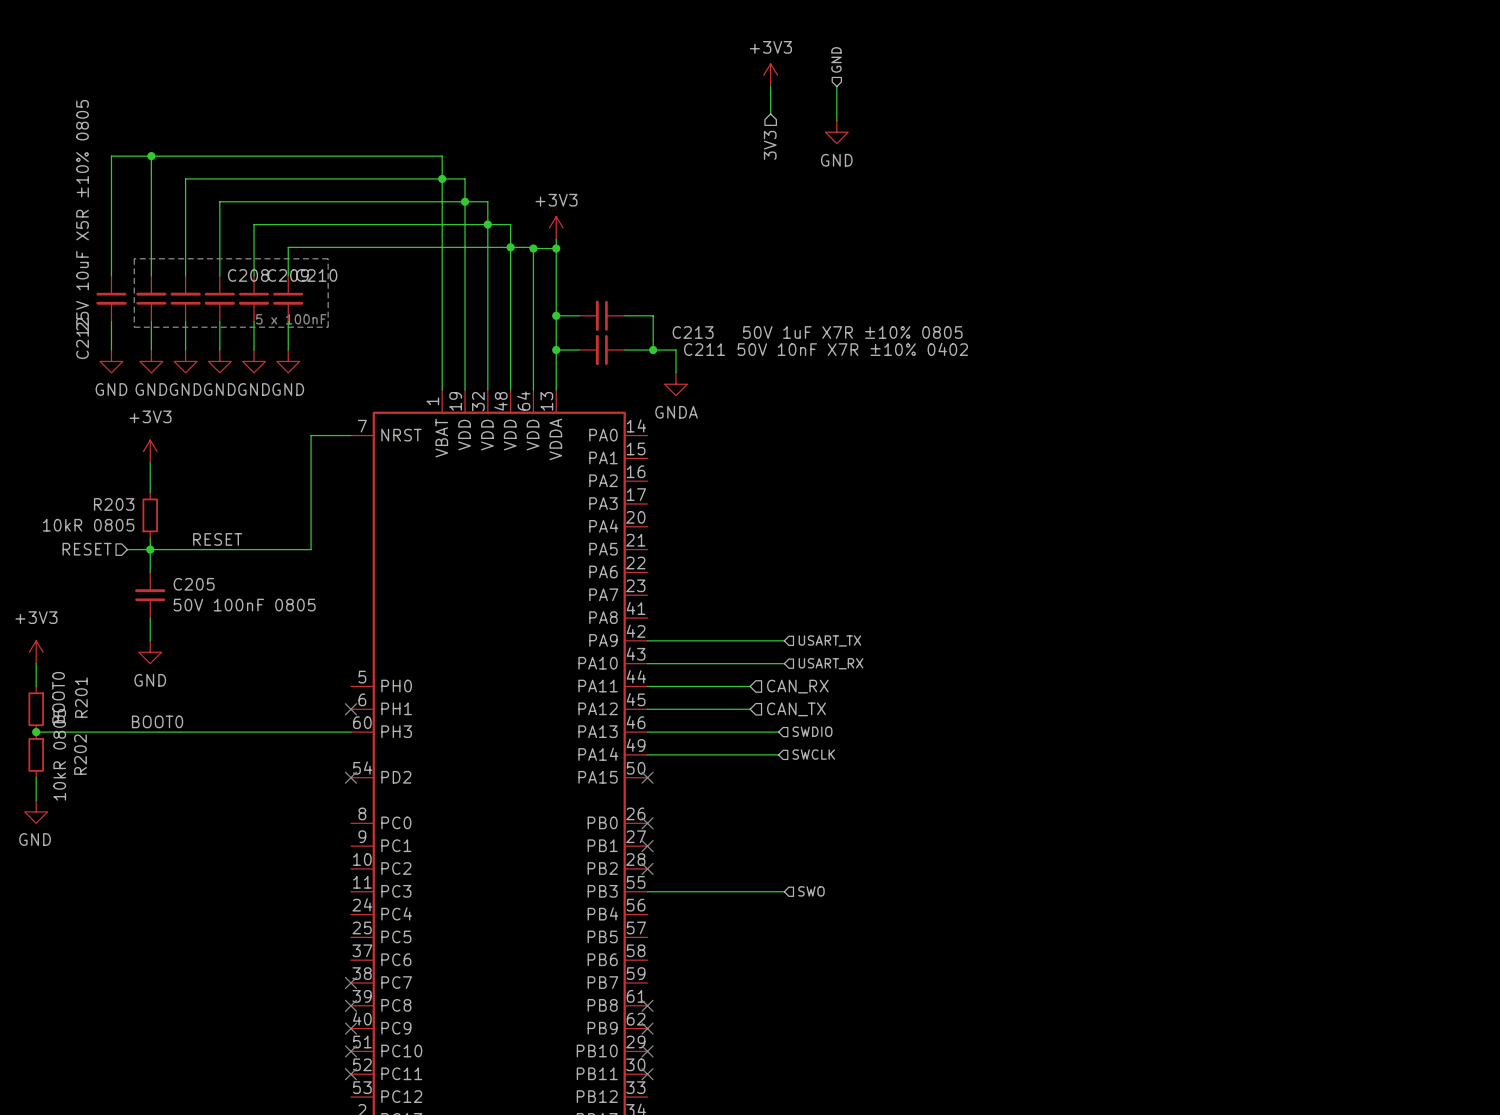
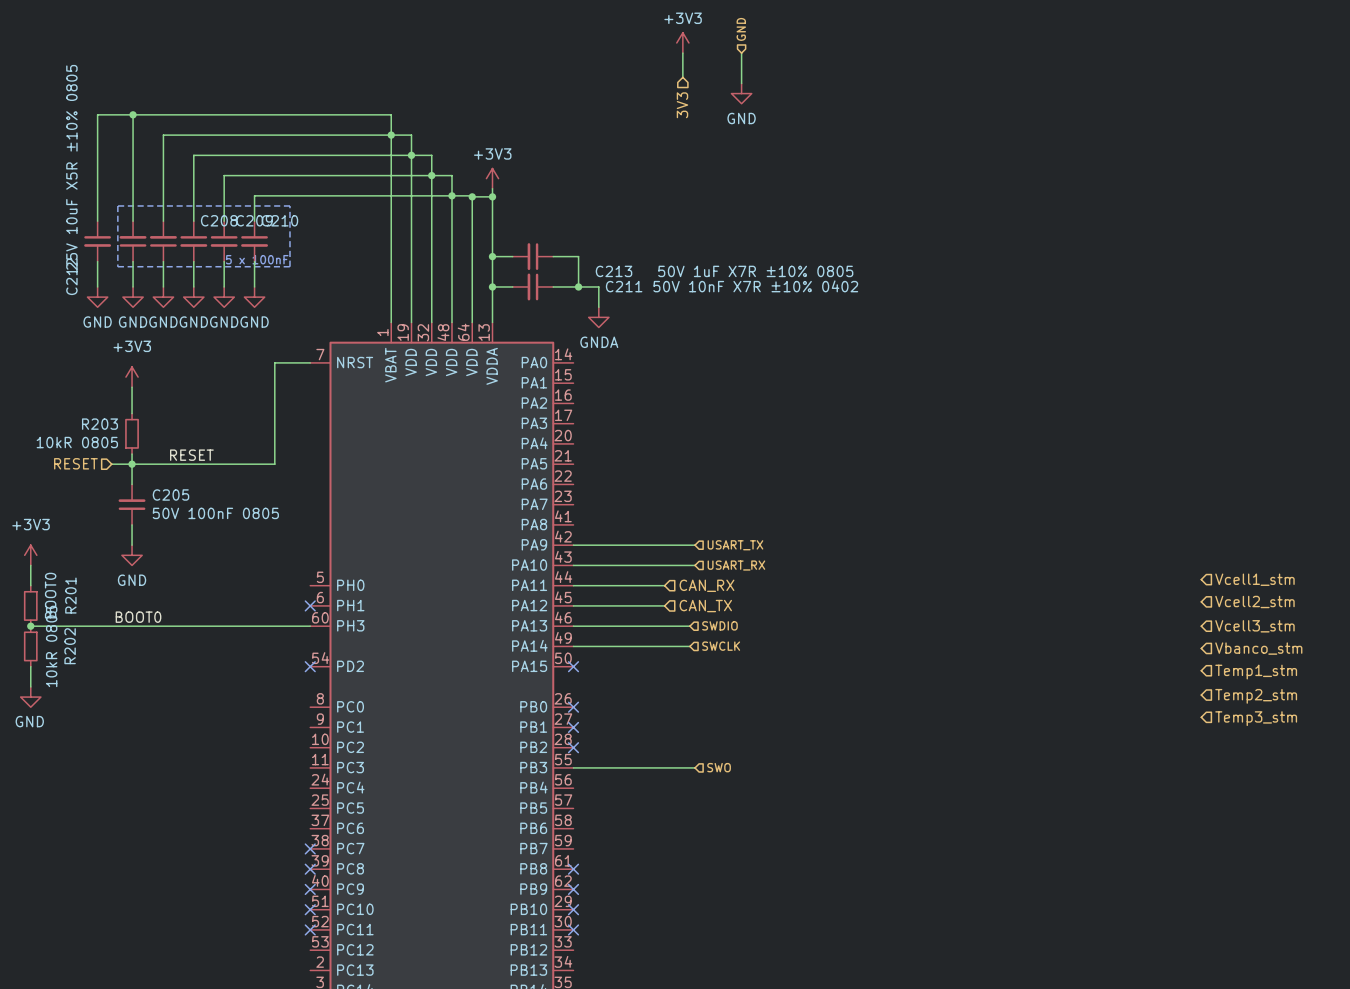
hierarchical label: none -> Vcell1_stm (1254, 579)
hierarchical label: none -> Vcell2_stm (1254, 601)
hierarchical label: none -> Vcell3_stm (1254, 626)
hierarchical label: none -> Vbanco_stm (1258, 648)
hierarchical label: none -> Temp1_stm (1256, 672)
hierarchical label: none -> Temp2_stm (1256, 696)
hierarchical label: none -> Temp3_stm (1256, 718)

